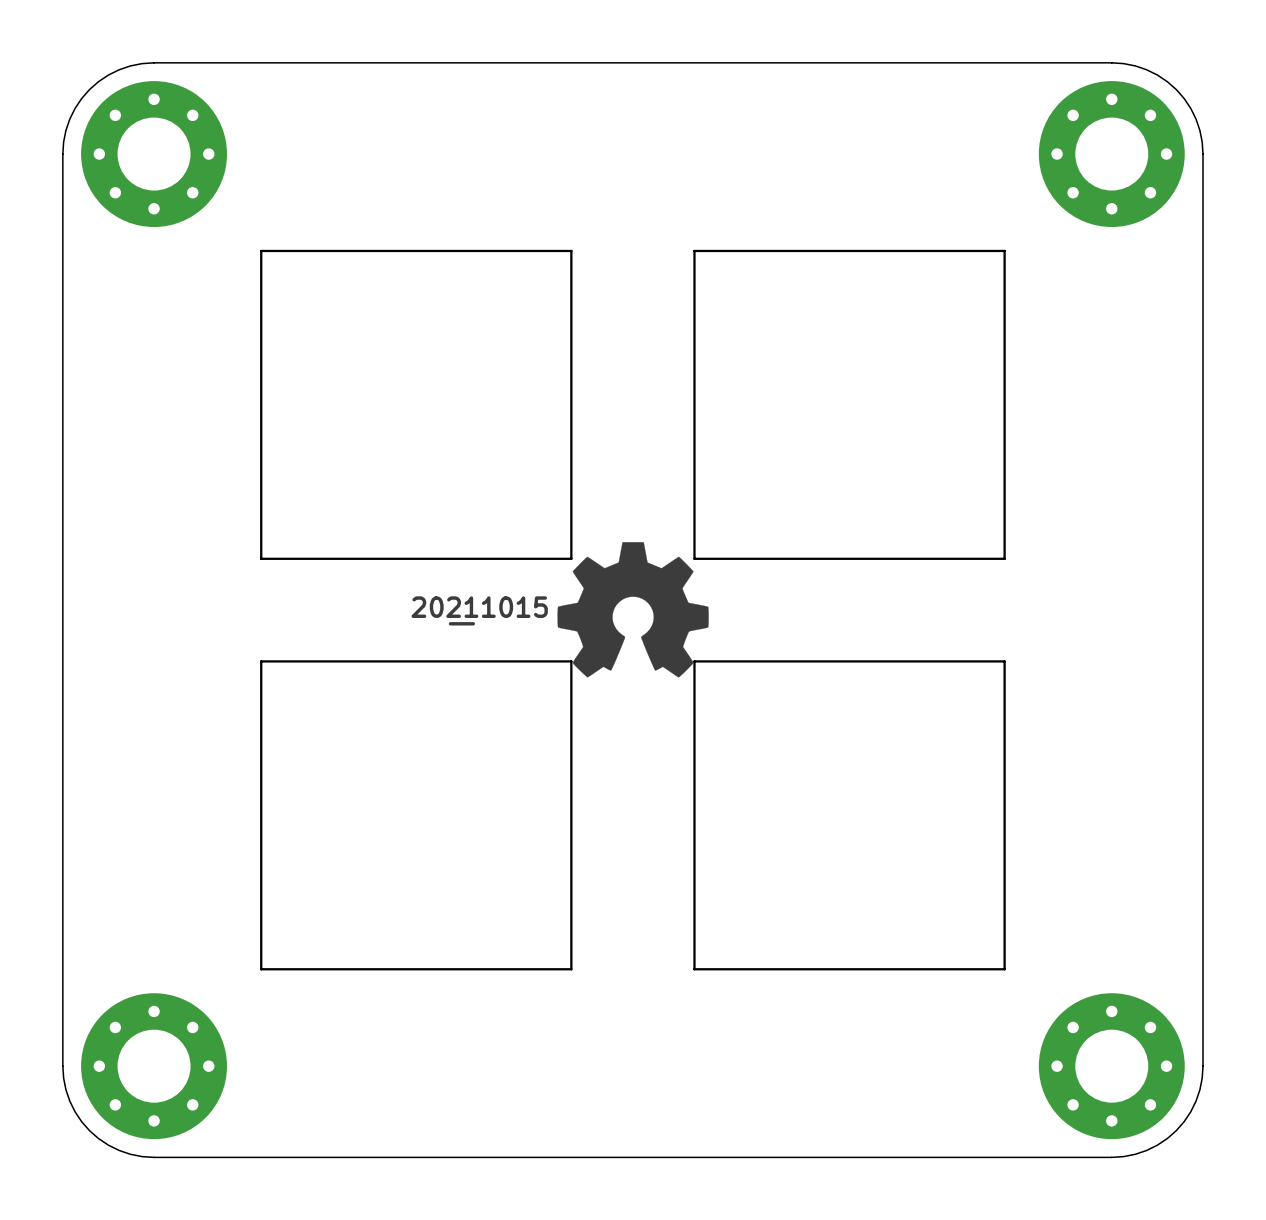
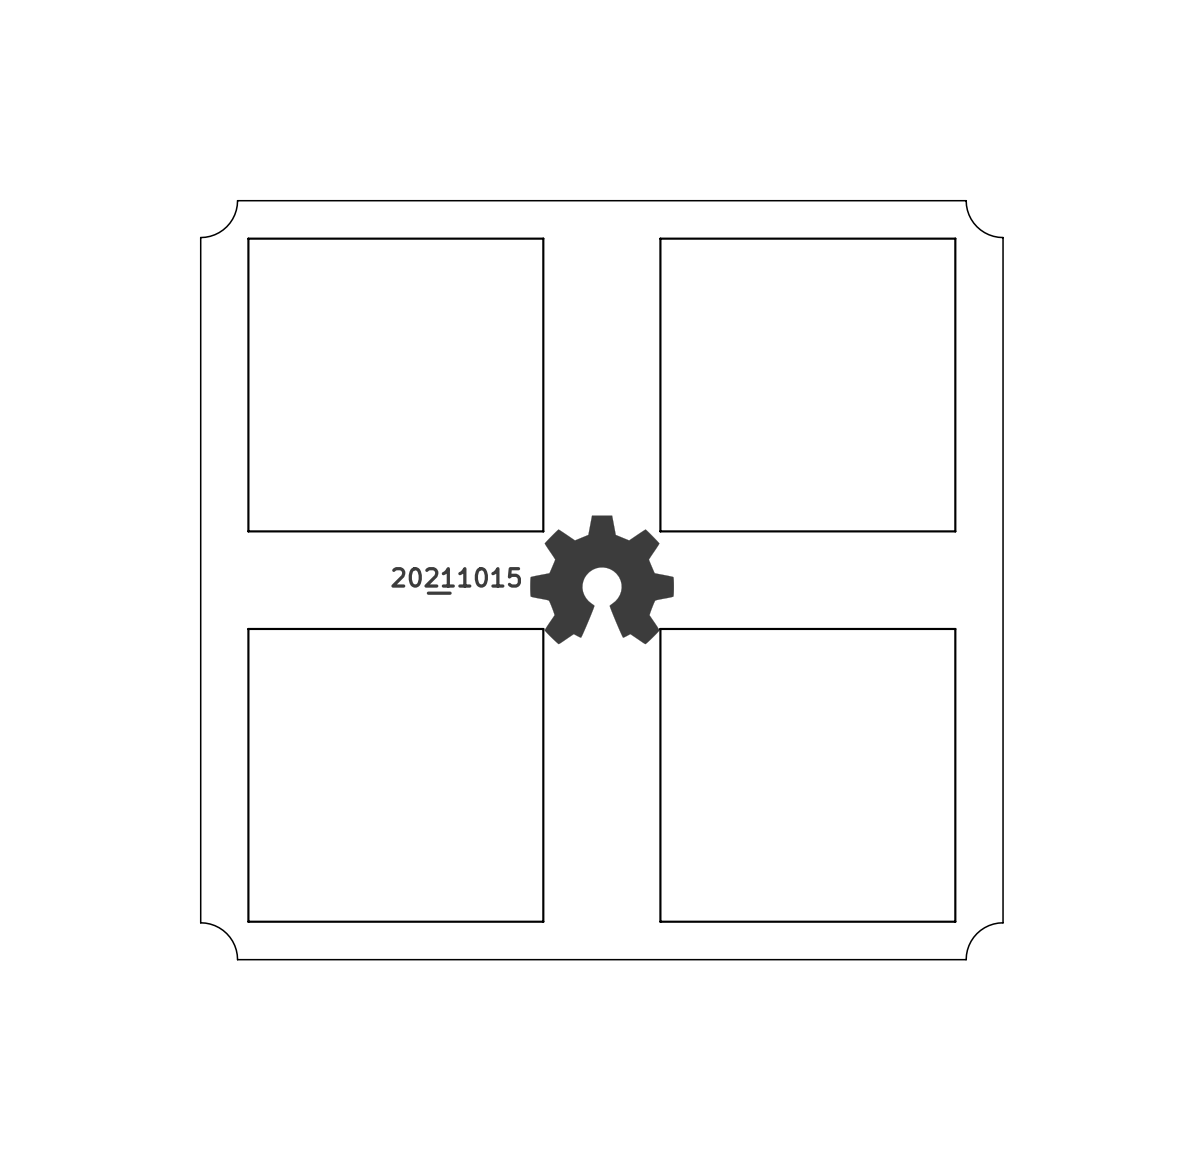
board edge: (1111, 62) (154, 62) (142, 63) (119, 69) (98, 81) (89, 89) (75, 108) (69, 119) (65, 130) (62, 154) (62, 1066) (65, 1089) (69, 1101) (75, 1111) (89, 1130) (98, 1138) (119, 1150) (130, 1154) (154, 1157) (1111, 1157) (1135, 1154) (1146, 1150) (1167, 1138) (1176, 1130) (1190, 1111) (1196, 1101) (1199, 1089) (1203, 1066) (1203, 154) (1199, 130) (1196, 119) (1190, 108) (1176, 89) (1167, 81) (1146, 69) (1123, 63) (1111, 62) -> (966, 200) (968, 214) (976, 226) (988, 234) (1003, 237) (1003, 922) (988, 925) (976, 933) (968, 945) (966, 959) (237, 959) (234, 945) (226, 933) (214, 925) (200, 922) (200, 237) (214, 234) (226, 226) (234, 214) (237, 200) (966, 200)
part: (154, 154) -> none
part: (1111, 154) -> none
part: (154, 1066) -> none
part: (1111, 1066) -> none

